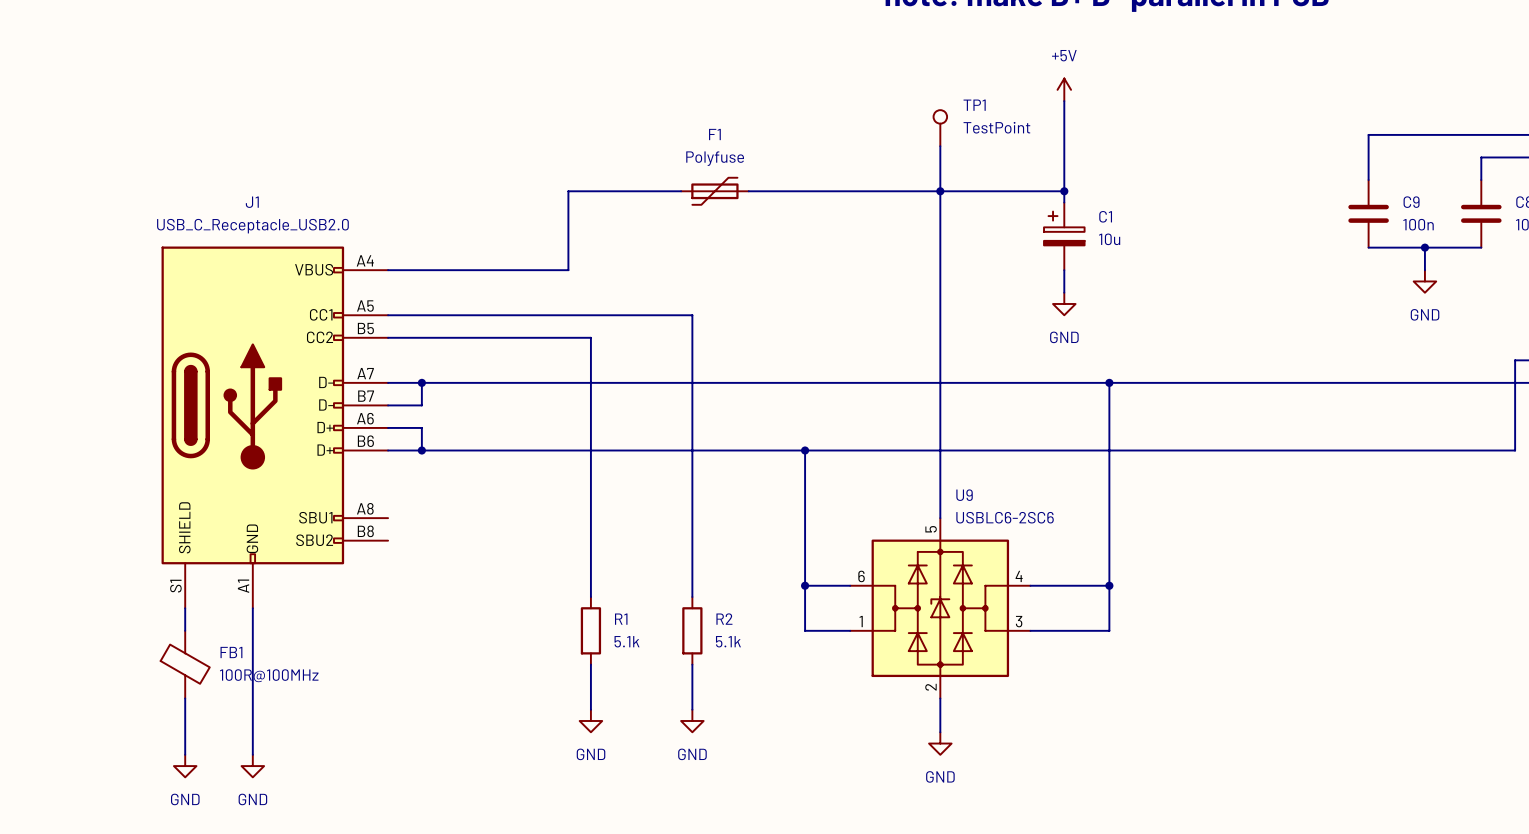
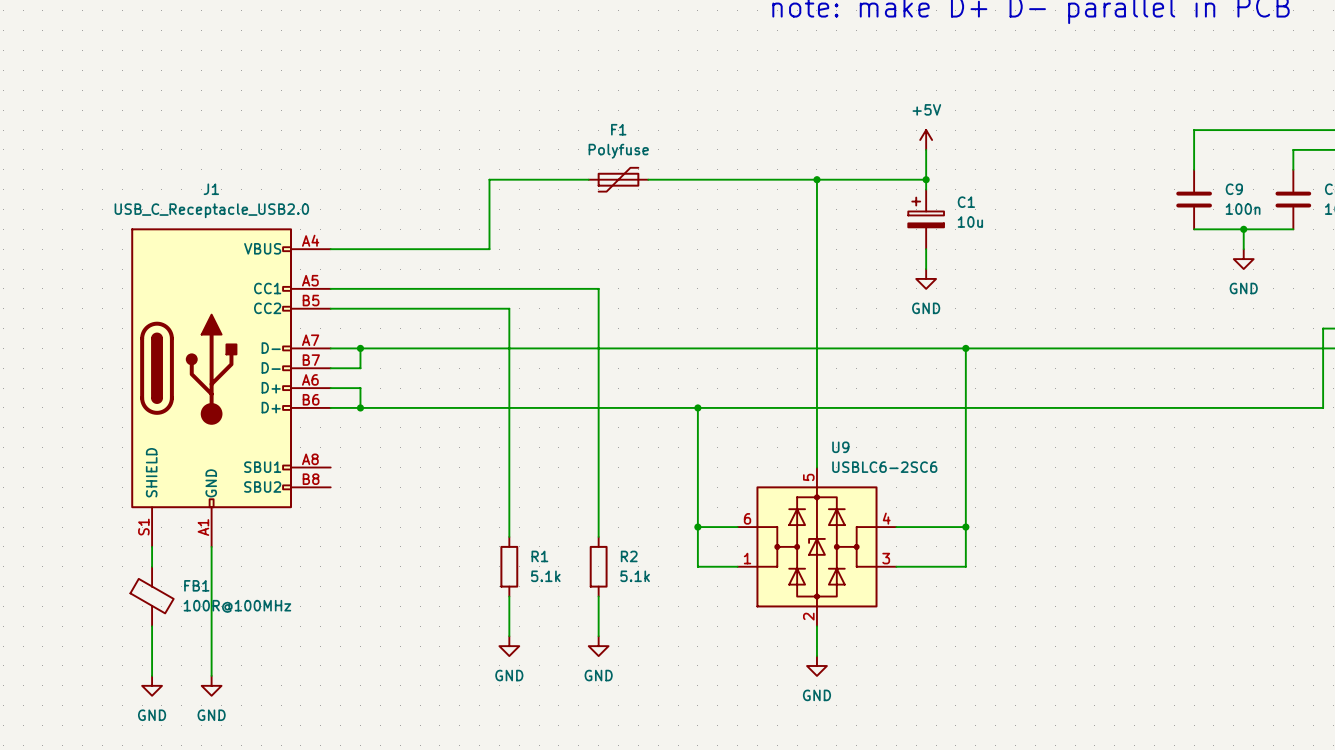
power symbol position: +5V (1064, 89) -> +5V (926, 140)
wire: (1064, 101) (1064, 157) -> none
TP1: TestPoint (940, 128) -> none
wire: (940, 146) (940, 191) -> none

